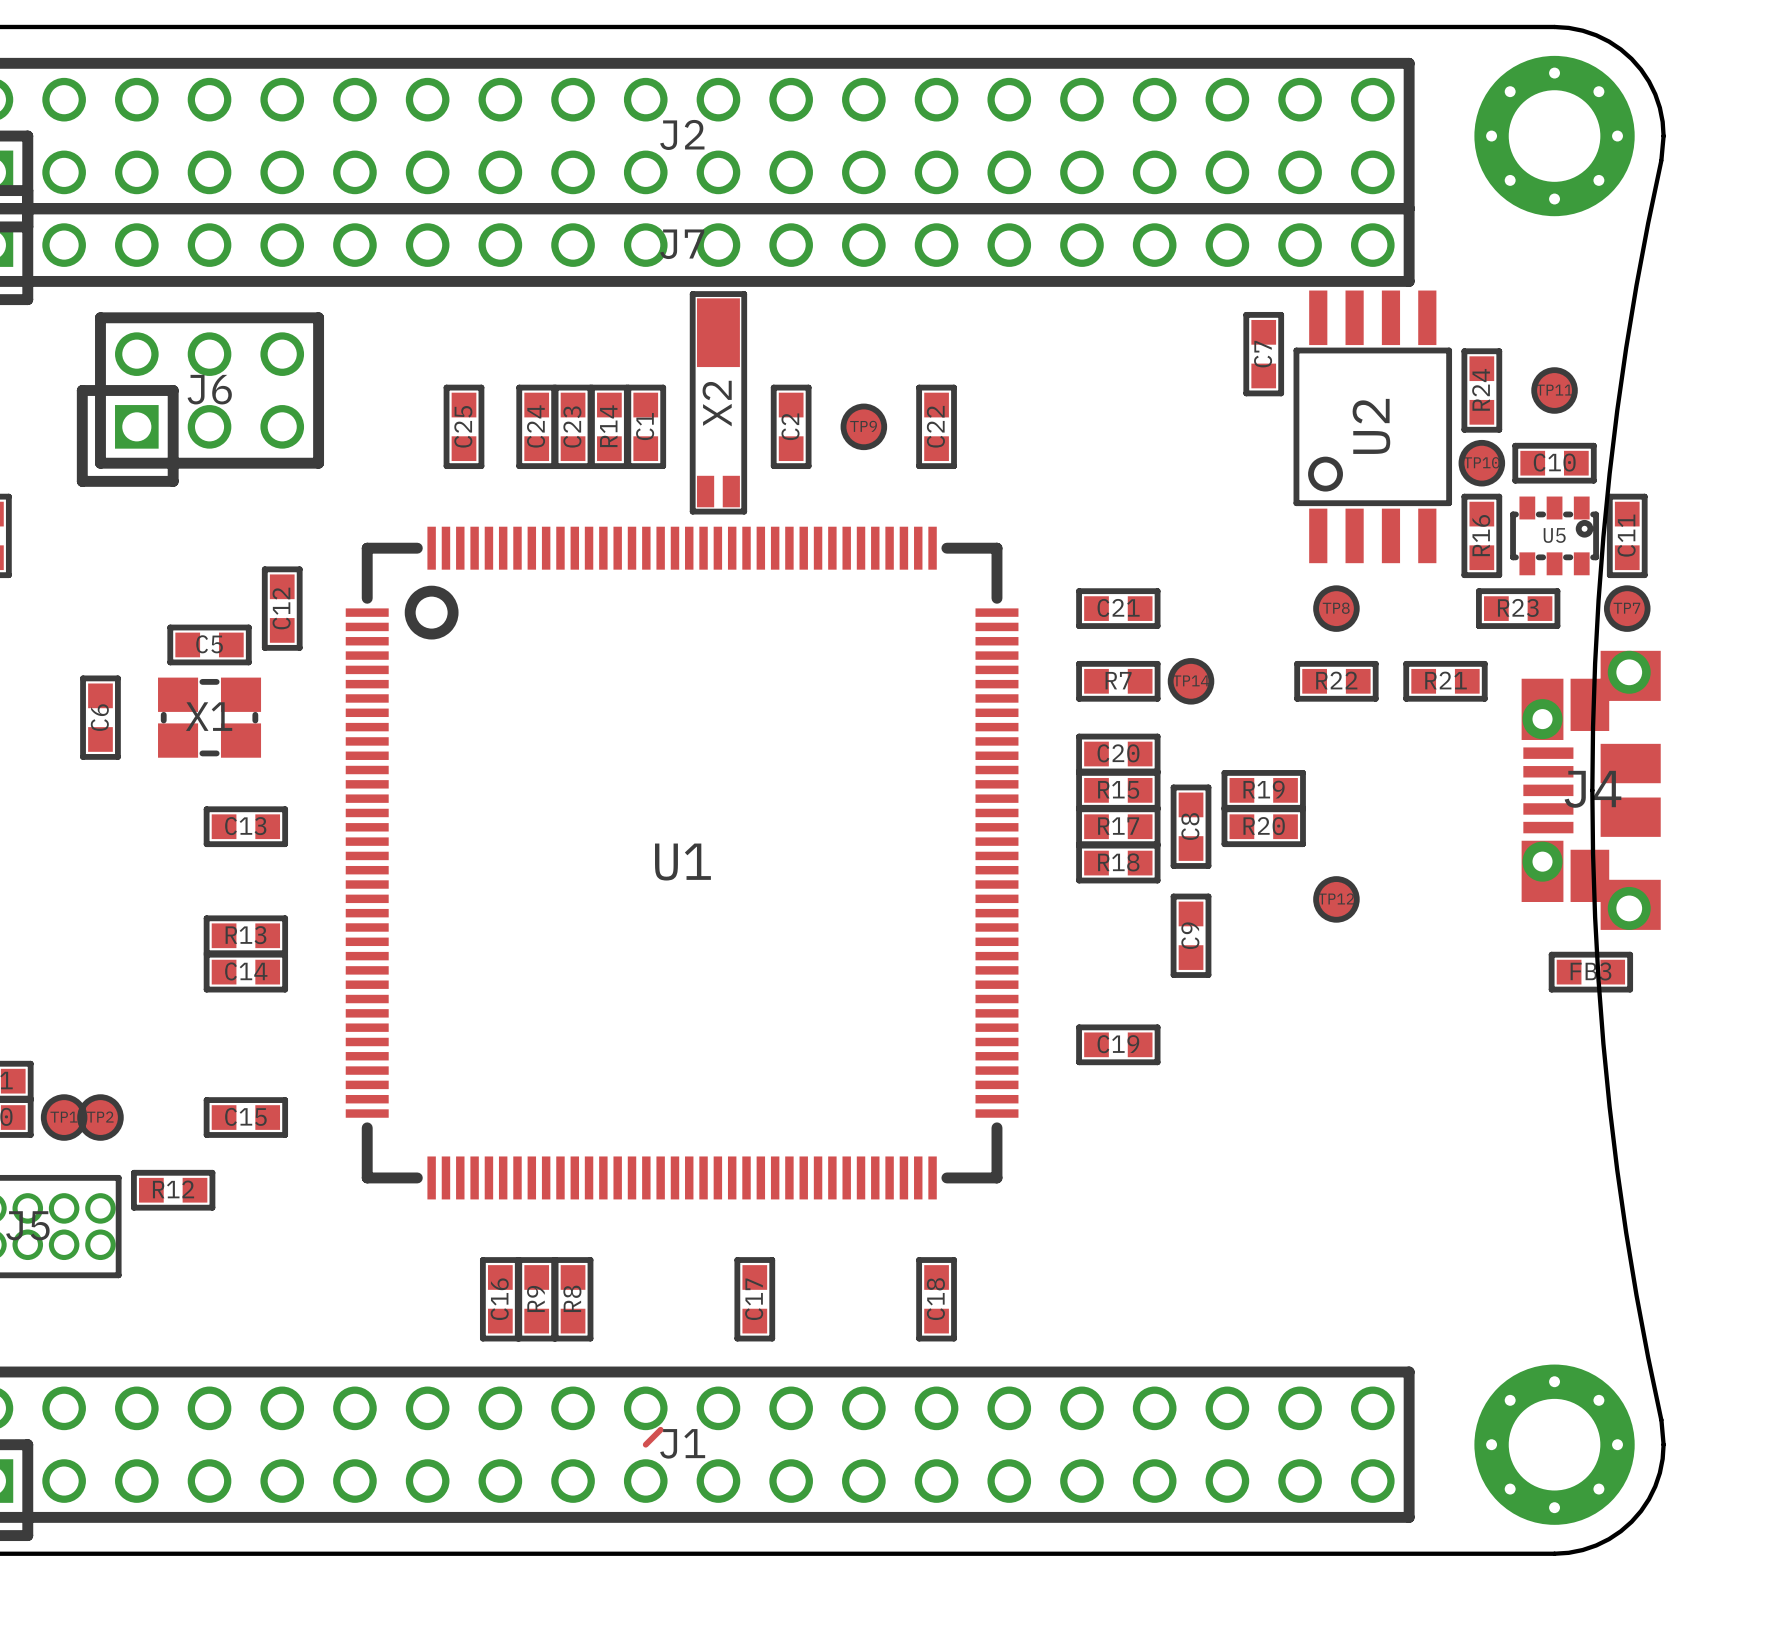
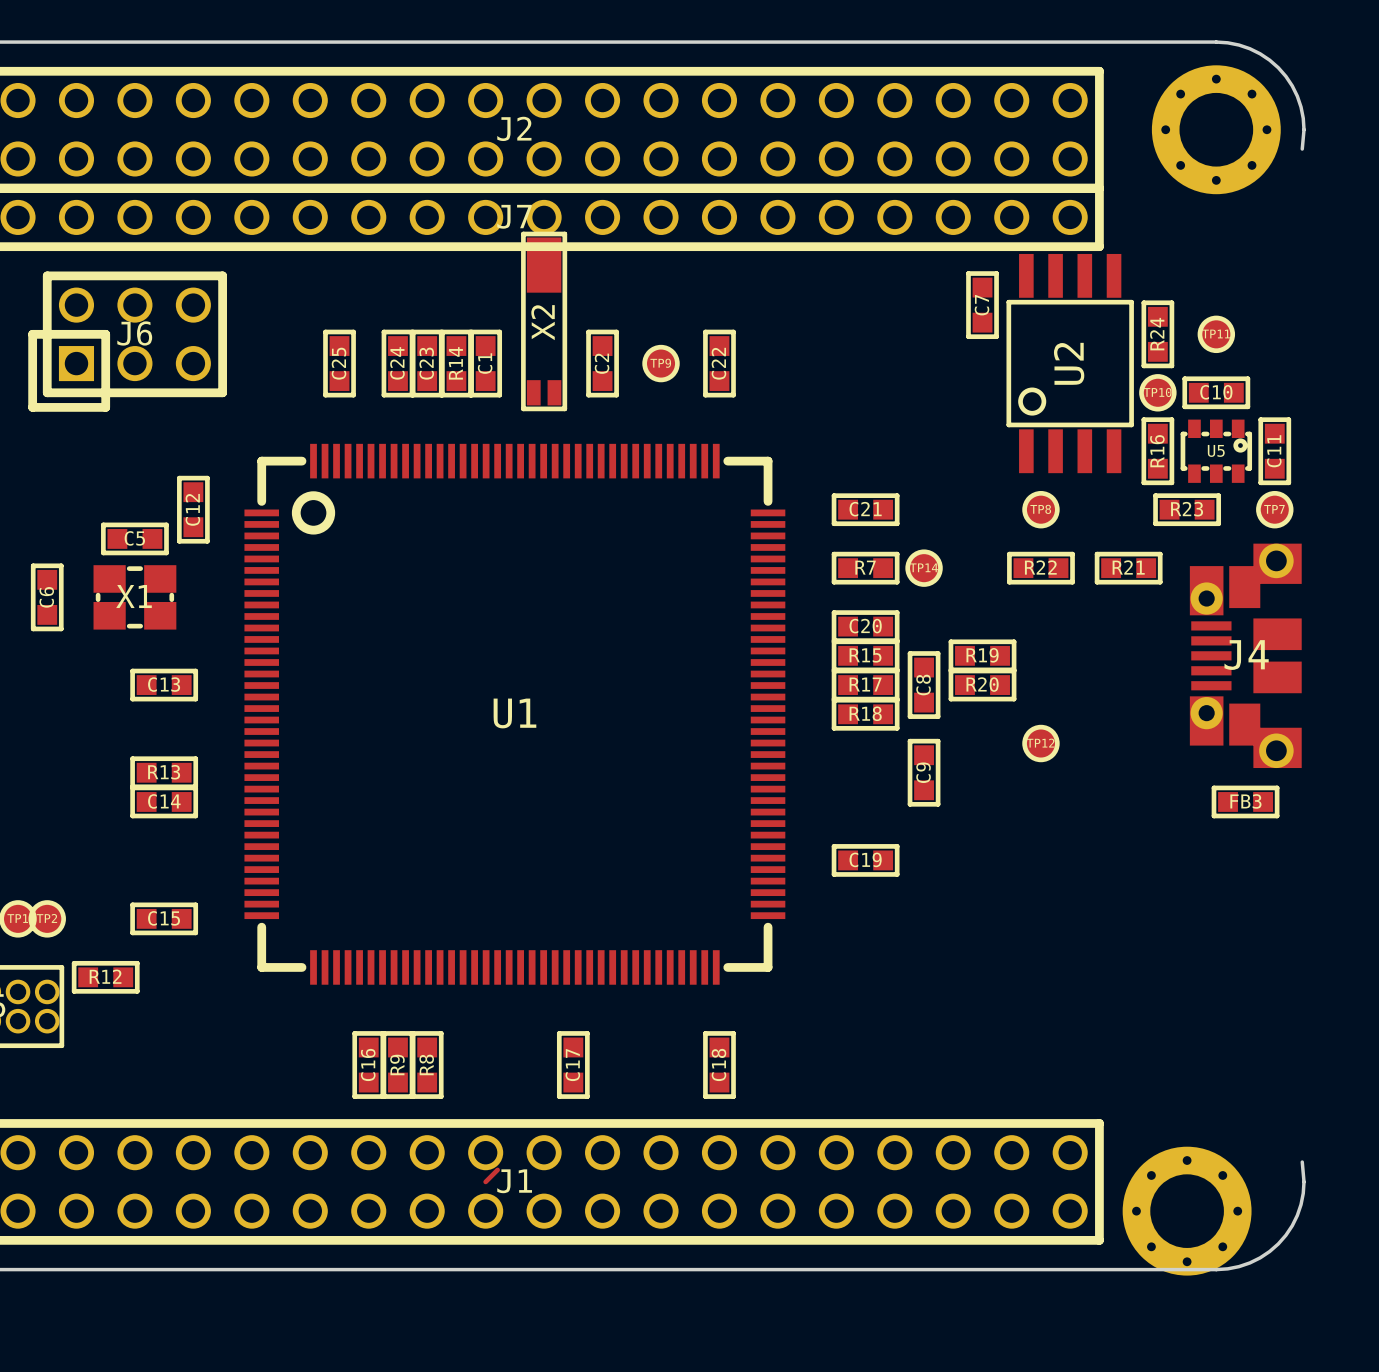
board edge: (1661, 160) (1626, 347) (1609, 473) (1598, 600) (1592, 790) (1598, 980) (1609, 1106) (1626, 1232) (1661, 1419) -> none
X2 position: (718, 402) -> (544, 321)
part position: (1554, 1444) -> (1187, 1211)

